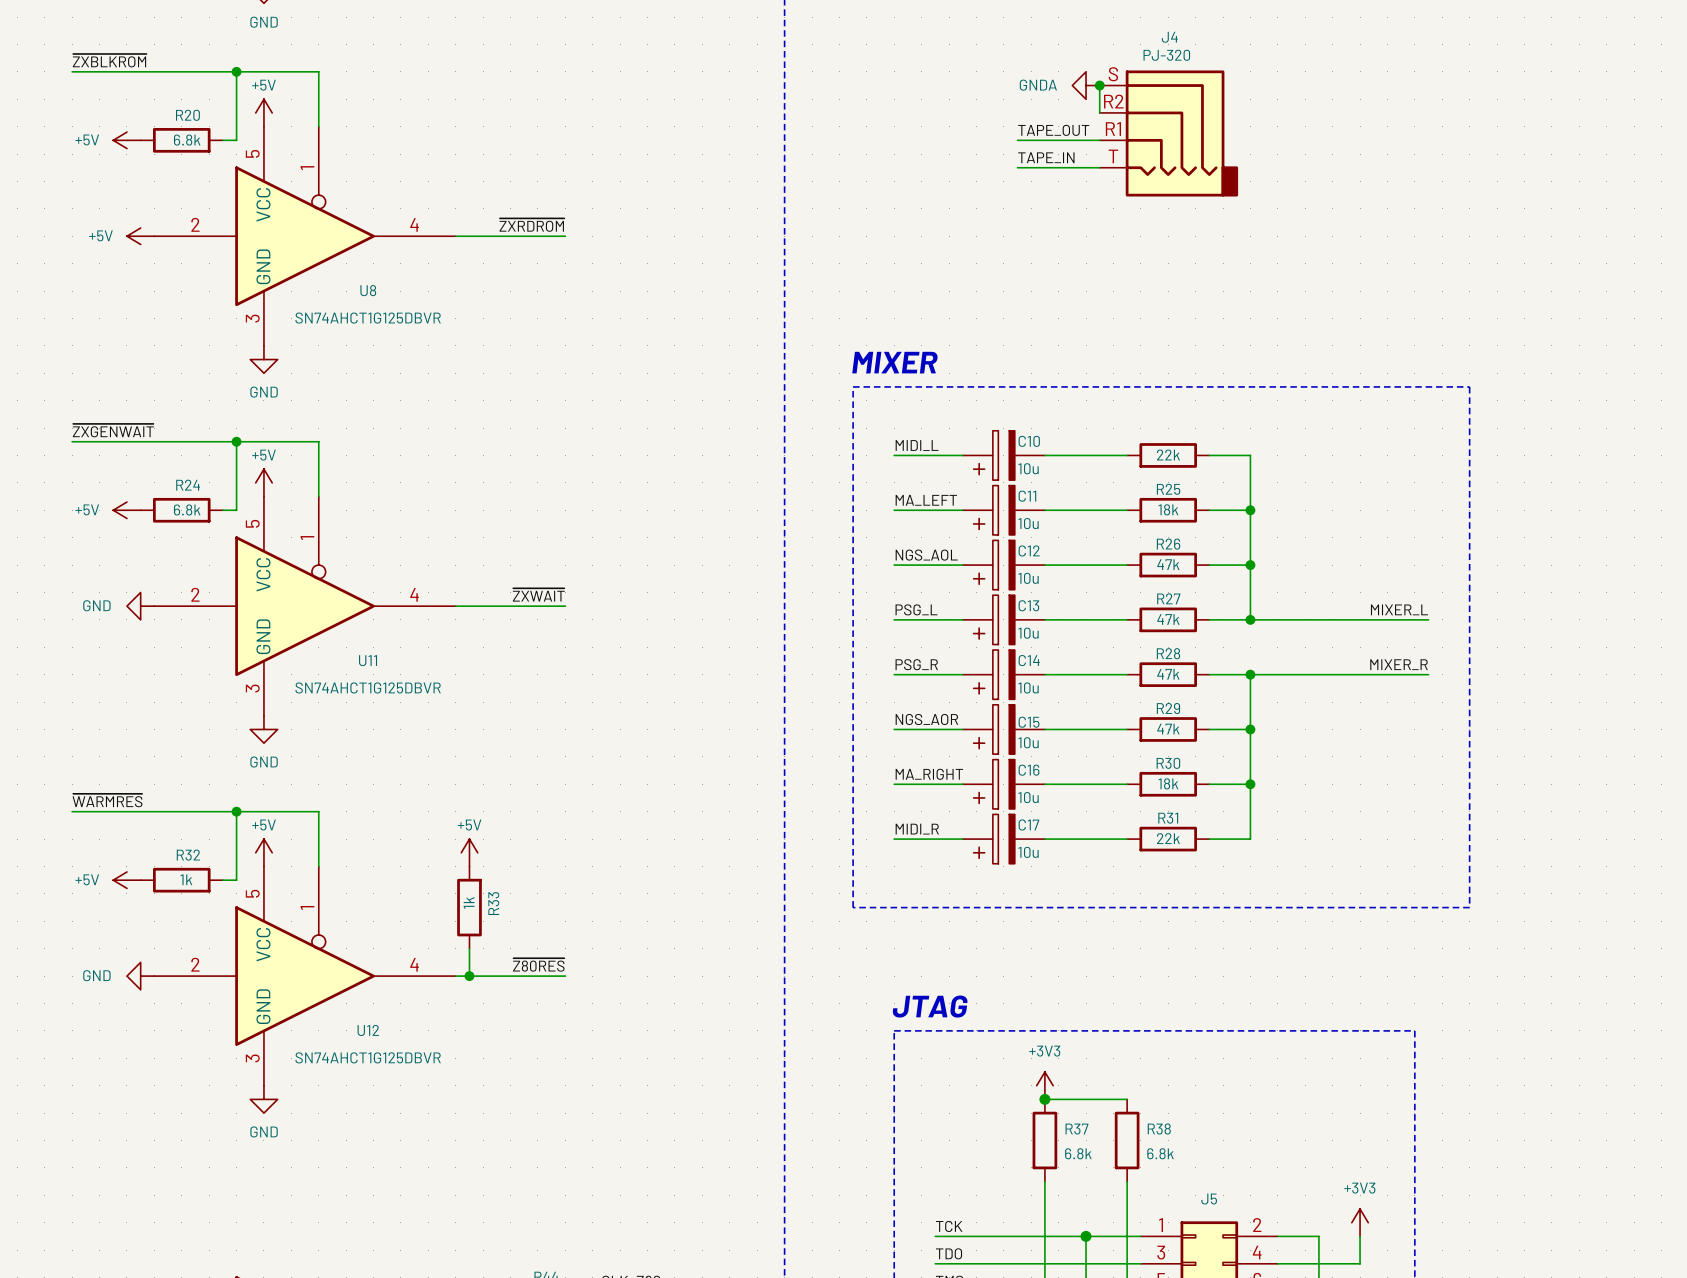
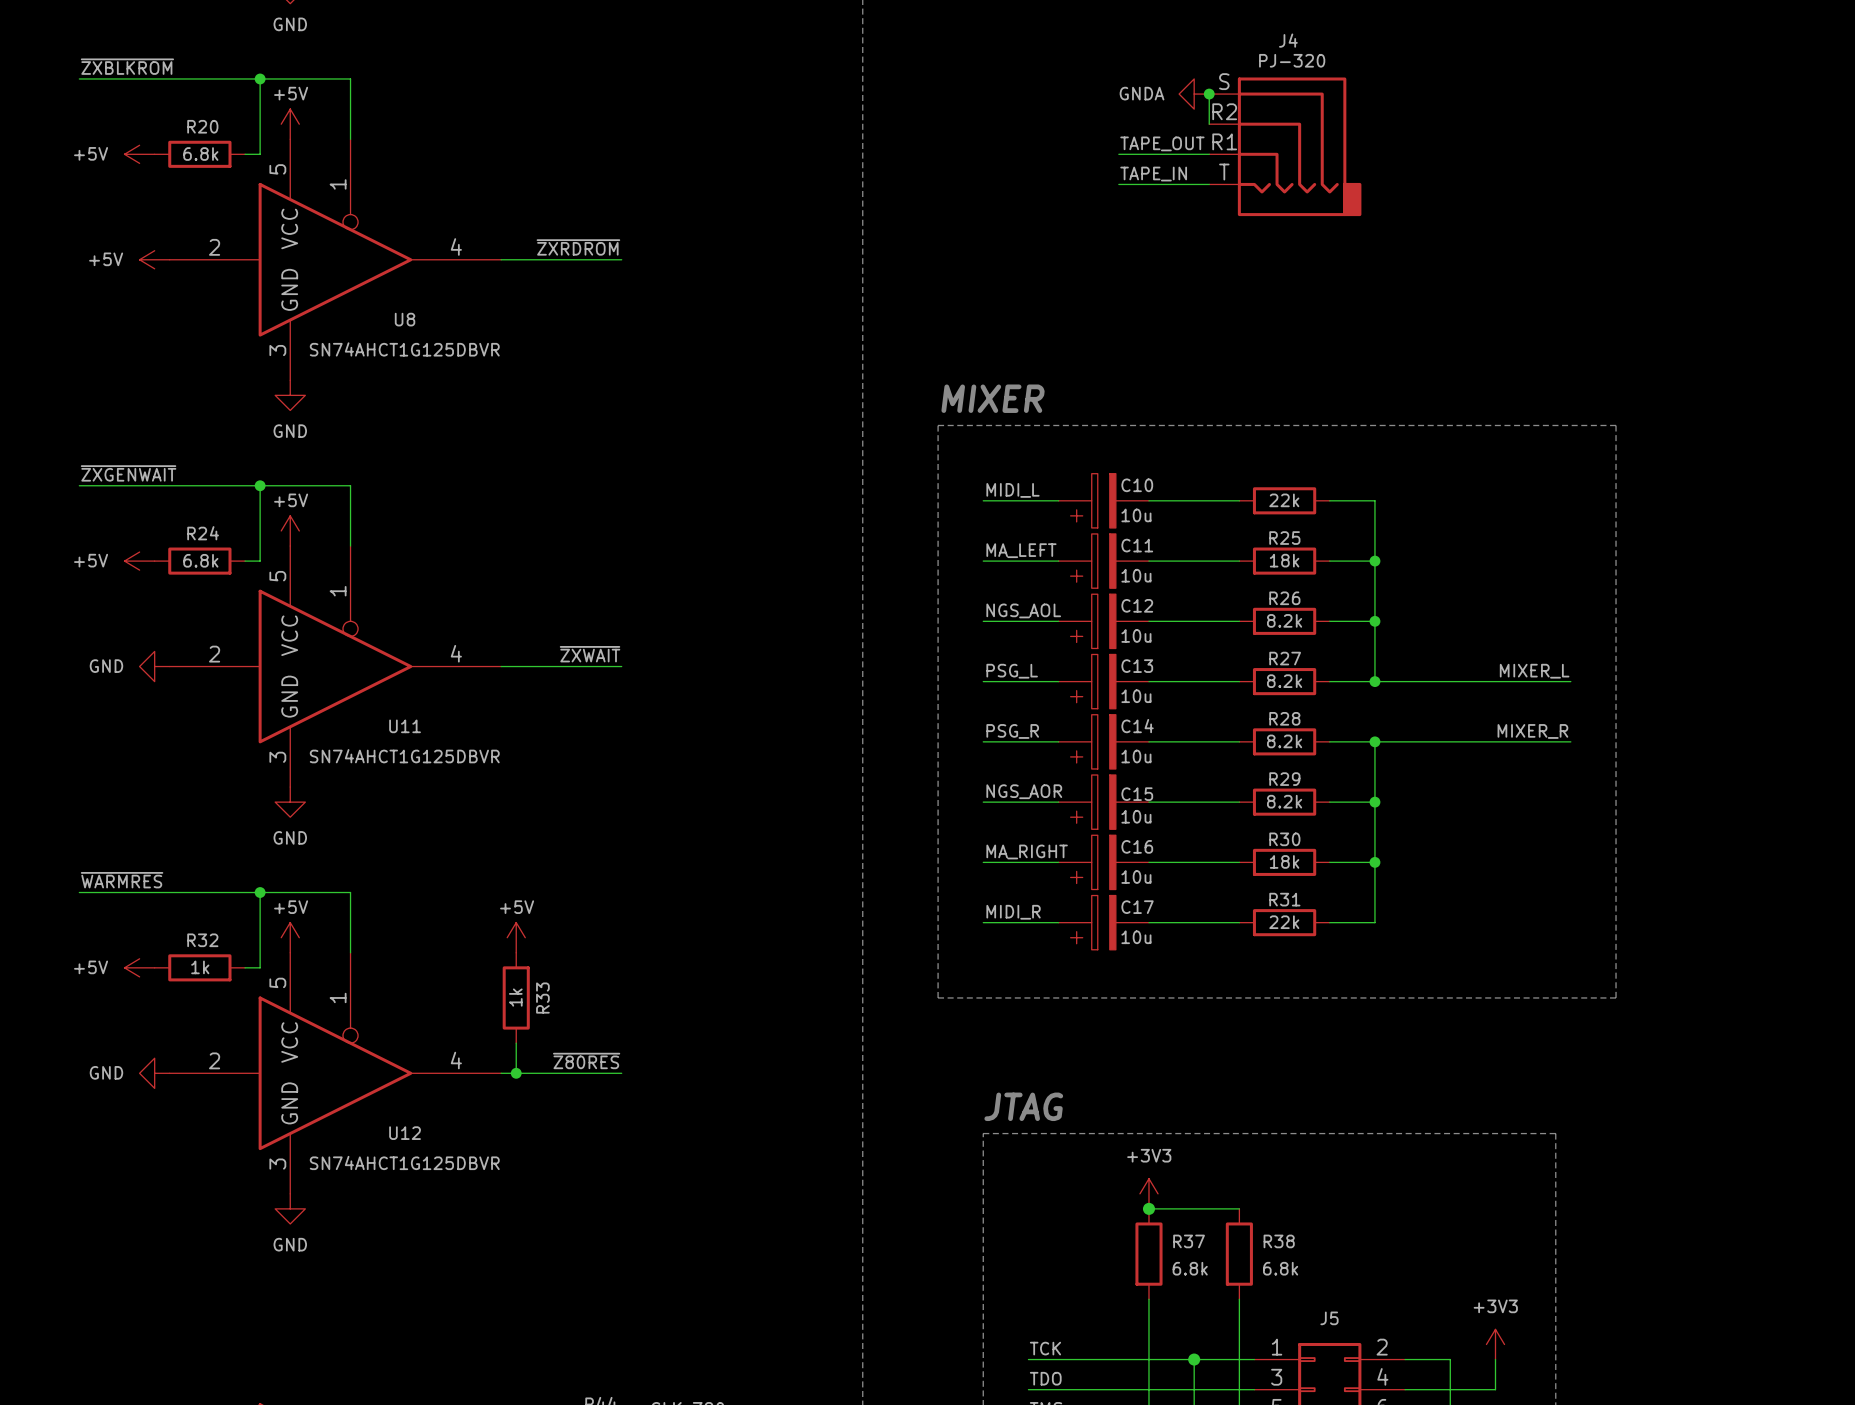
R26 value: 47k (1168, 564) -> 8.2k (1284, 620)
R27 value: 47k (1168, 619) -> 8.2k (1284, 681)
R28 value: 47k (1168, 674) -> 8.2k (1284, 741)
R29 value: 47k (1168, 729) -> 8.2k (1284, 801)

